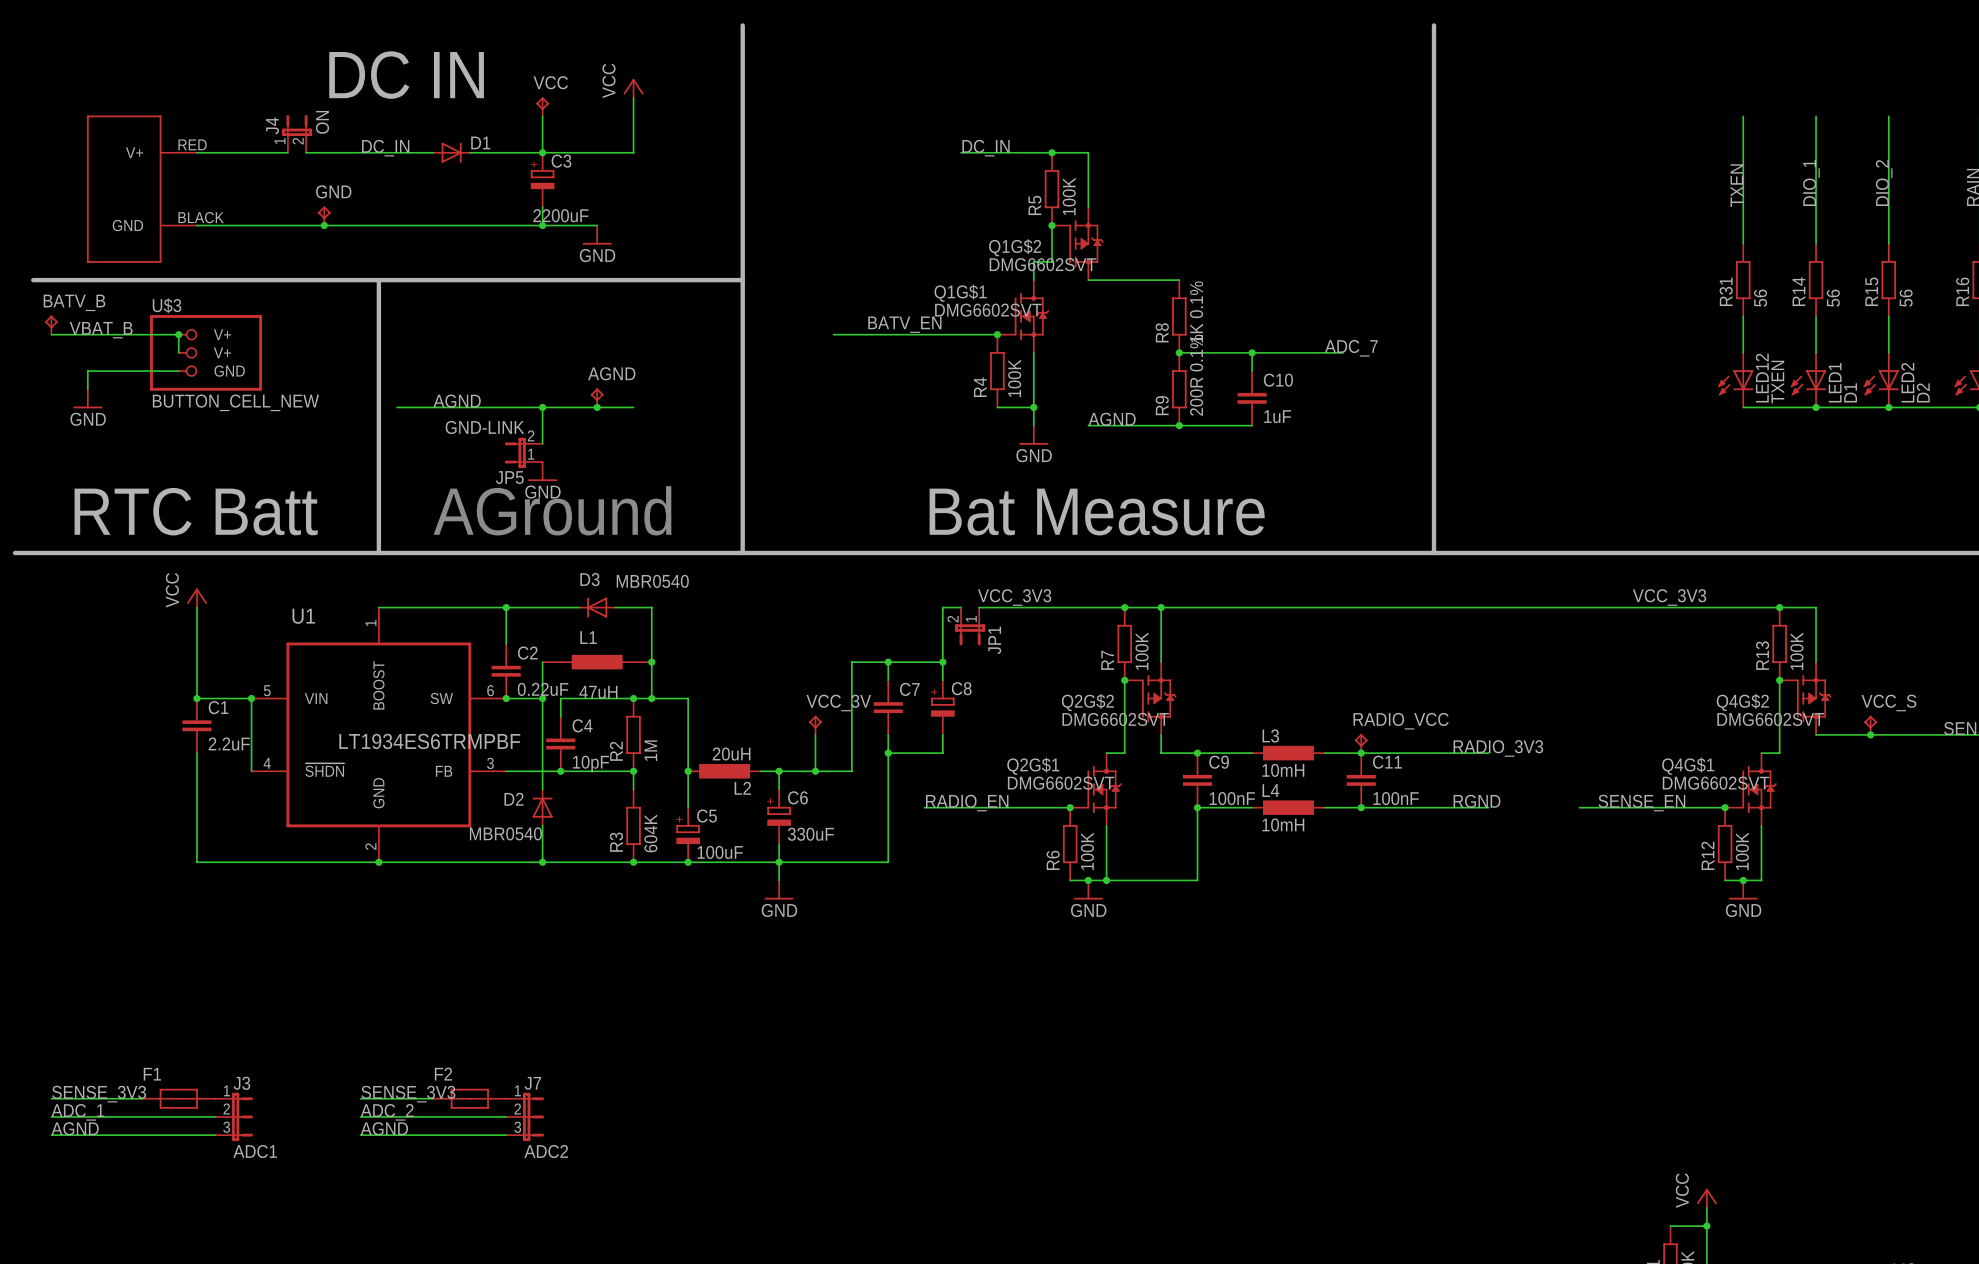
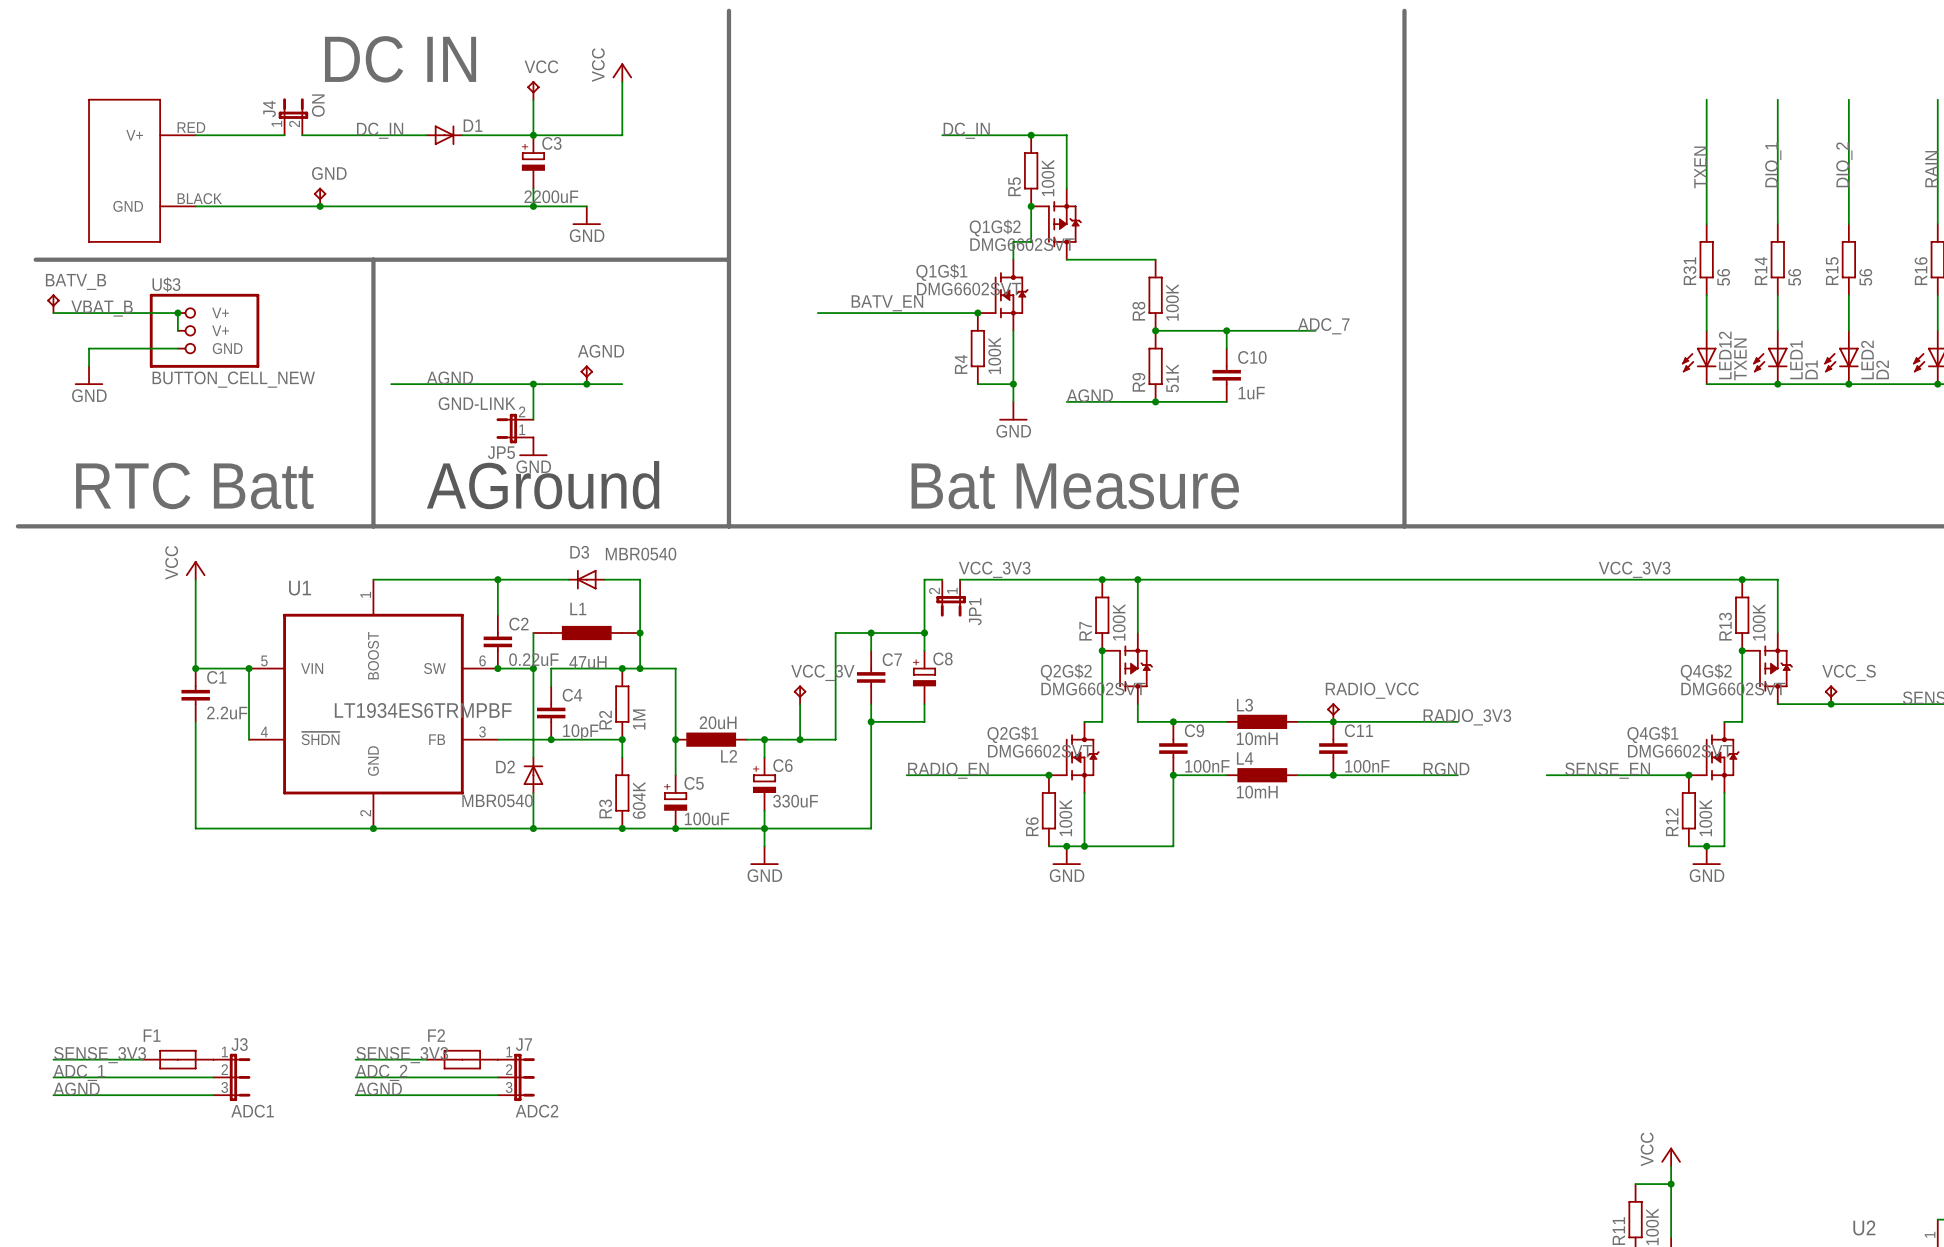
R8 value: 1K 0.1% (1196, 311) -> 100K (1172, 302)
R9 value: 200R 0.1% (1196, 375) -> 51K (1172, 378)

